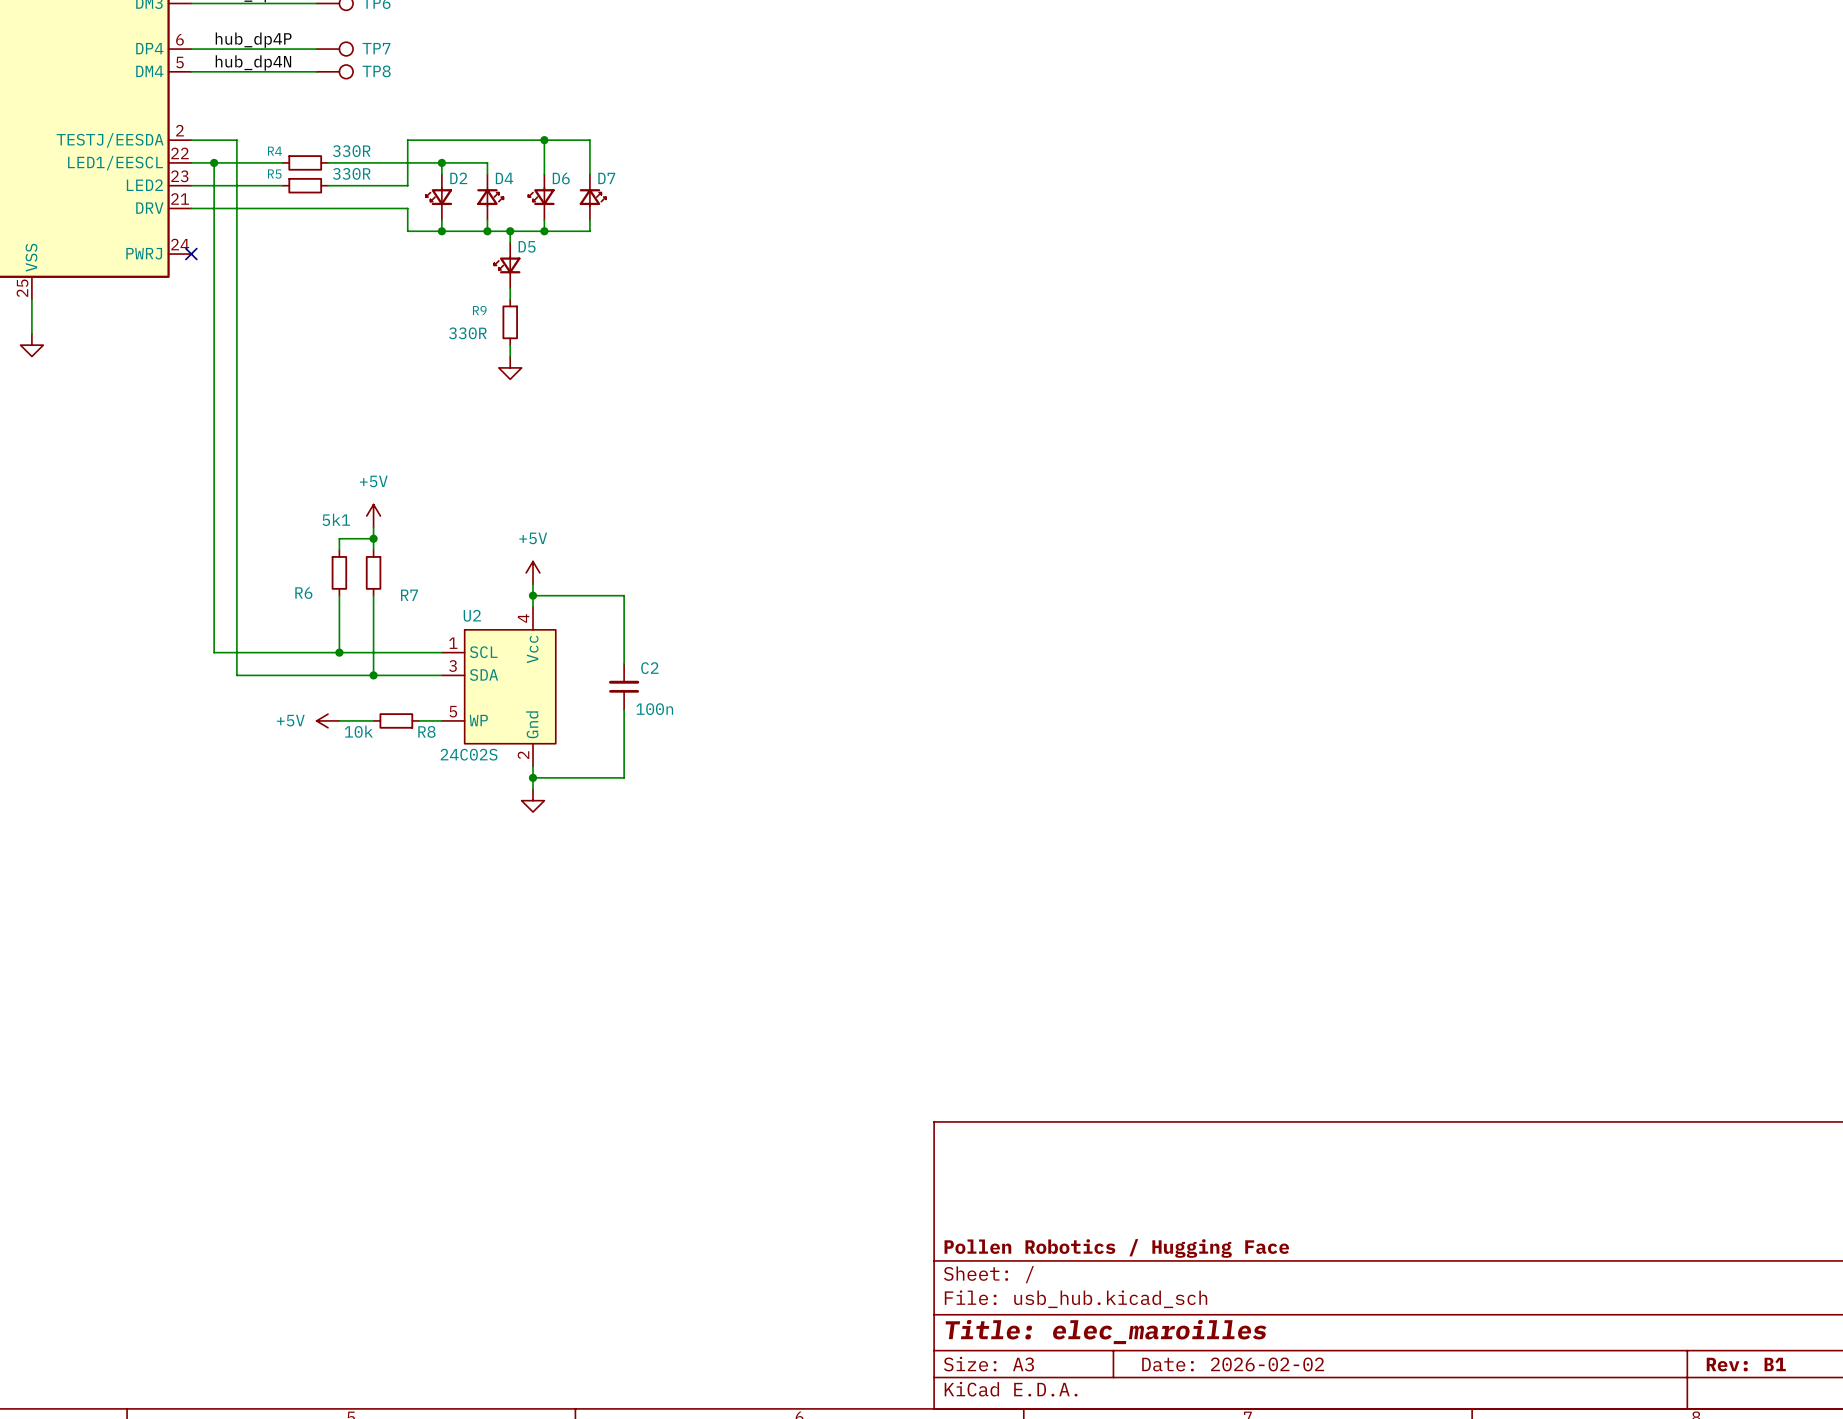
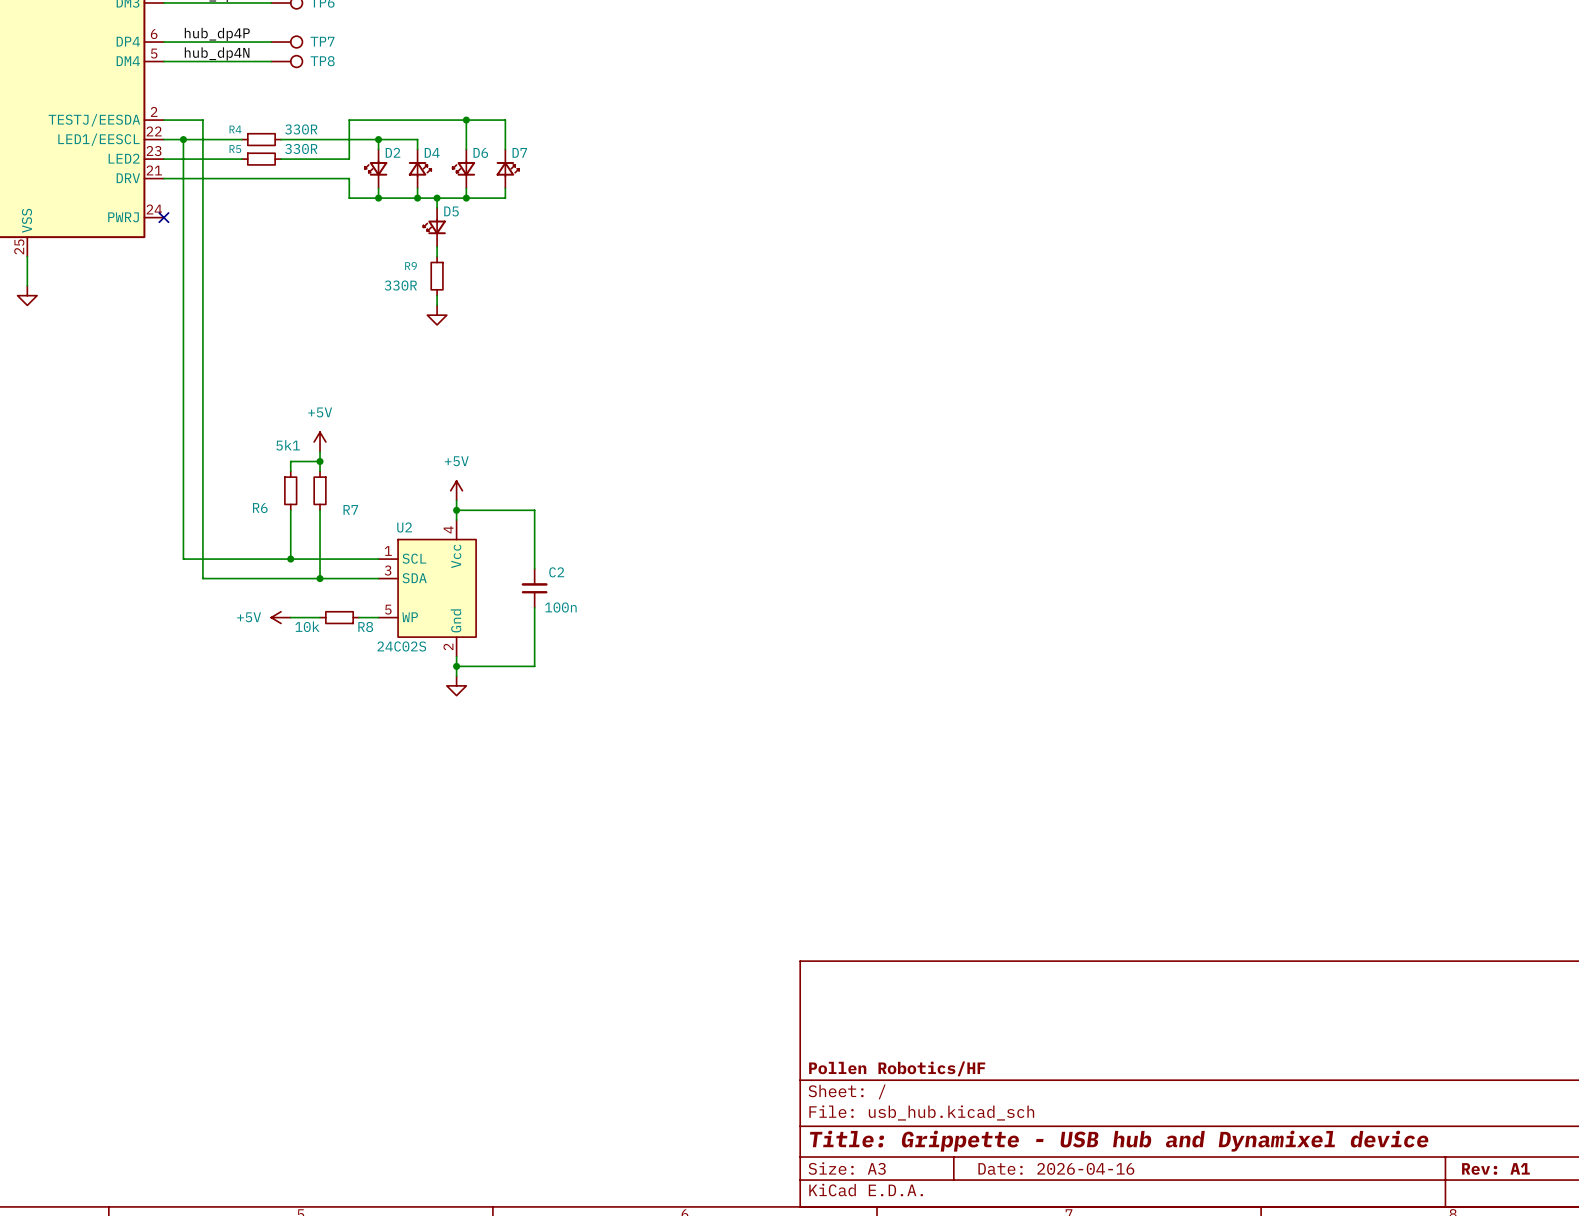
title block: Pollen Robotics / Hugging Face (1116, 1248) -> Pollen Robotics/HF (897, 1068)
title block: Title: elec_maroilles (1105, 1332) -> Title: Grippette - USB hub and Dynamixel device (1119, 1141)
title block: Date: 2026-02-02 (1233, 1364) -> Date: 2026-04-16 (1056, 1168)
title block: Rev: B1 (1746, 1364) -> Rev: A1 (1495, 1168)

